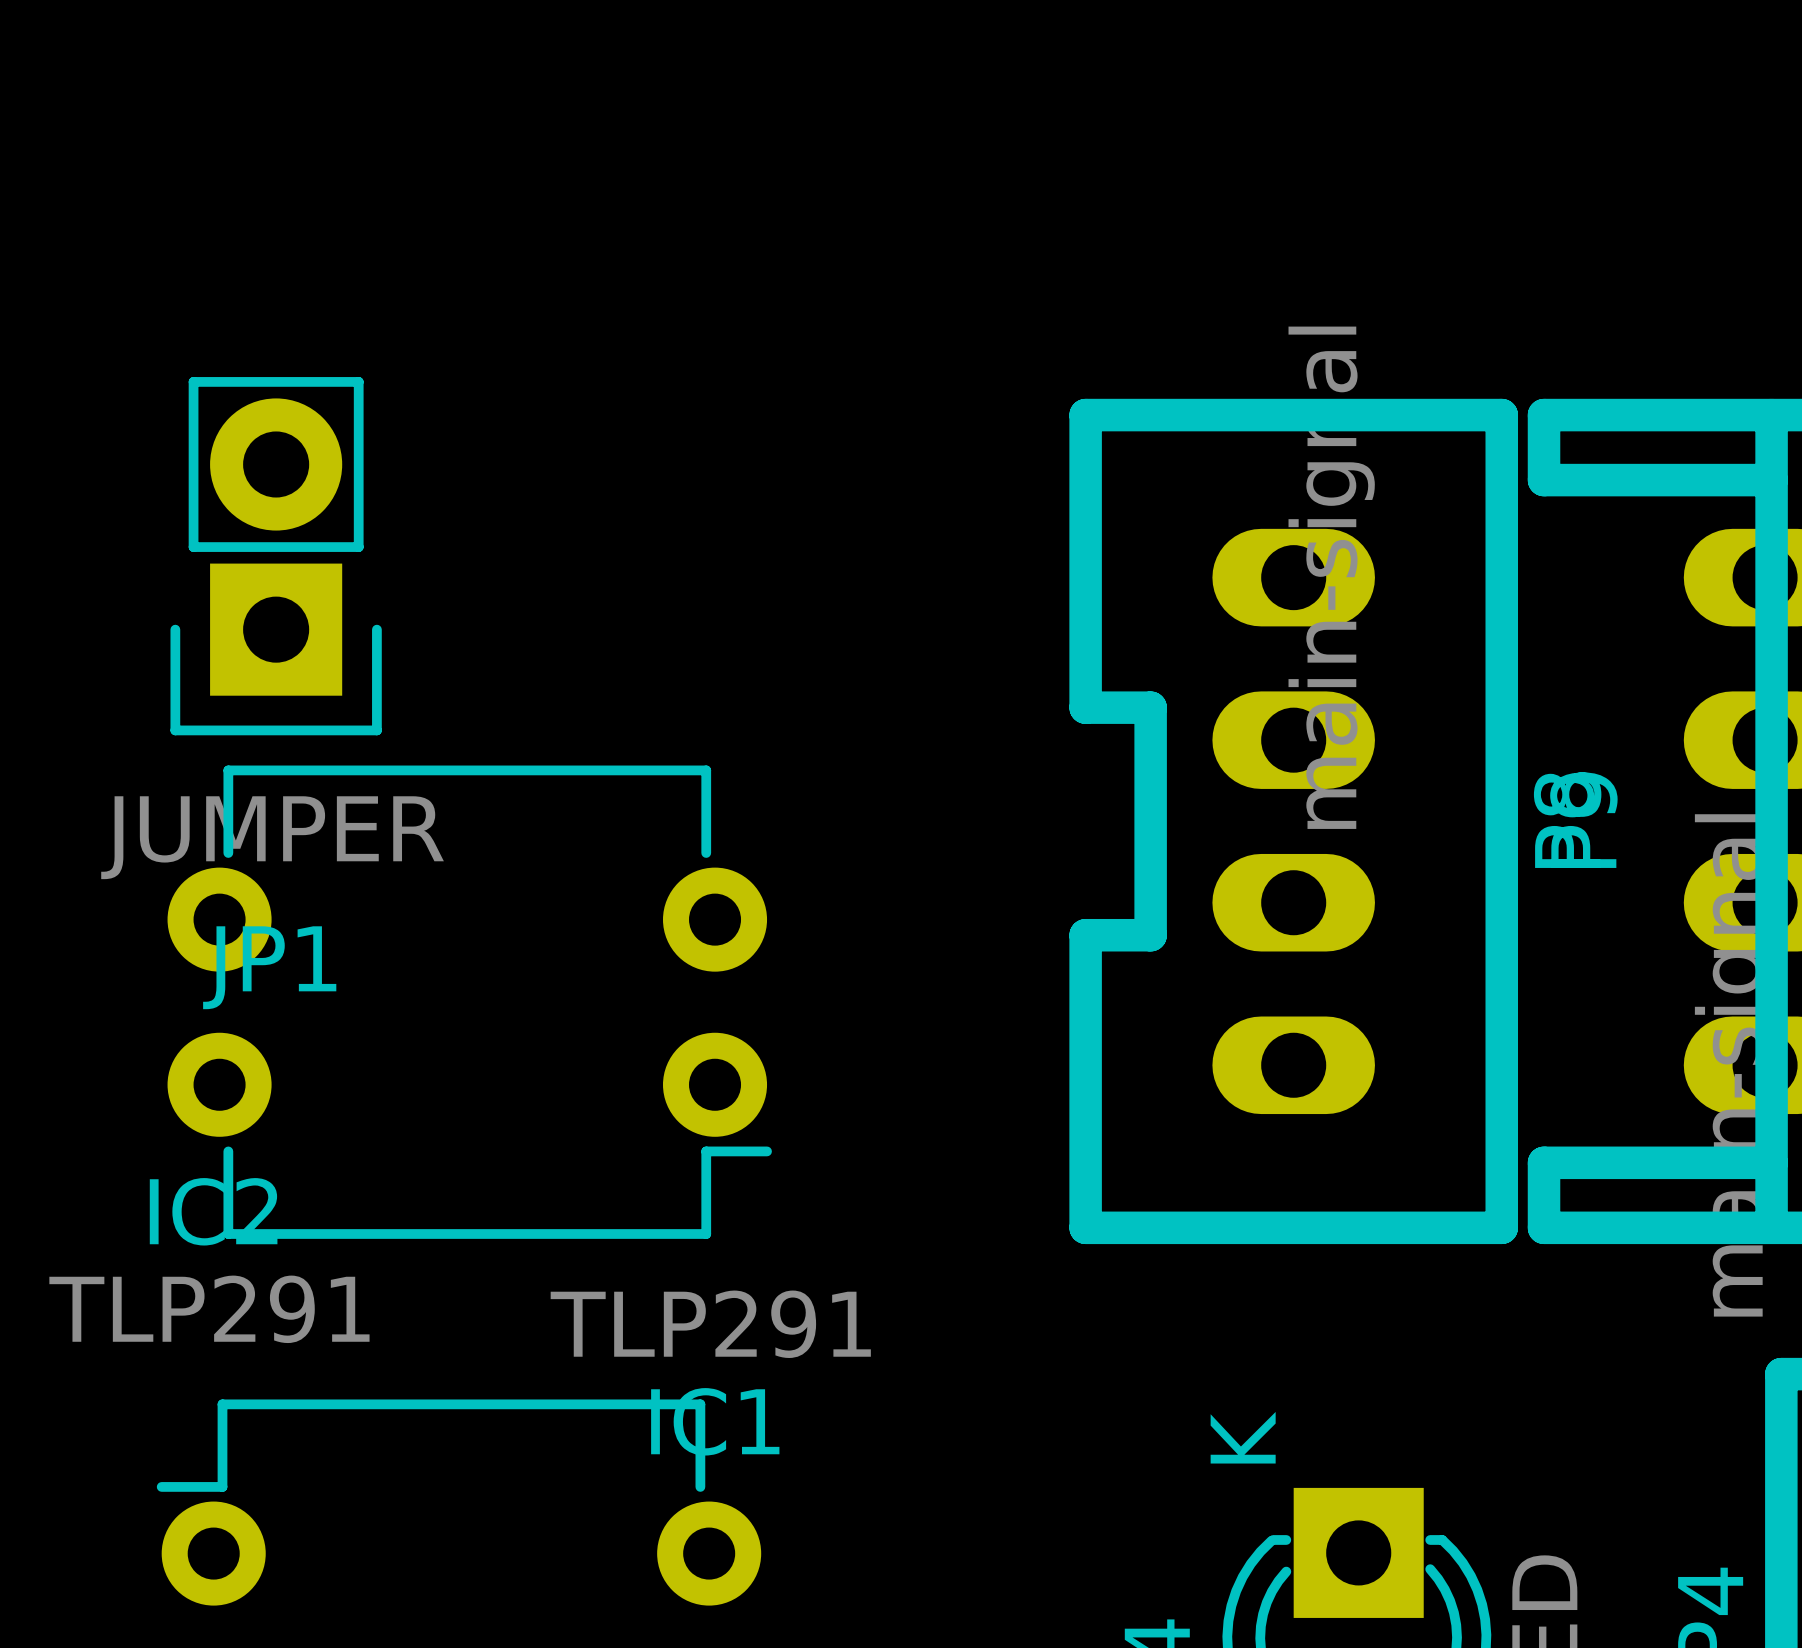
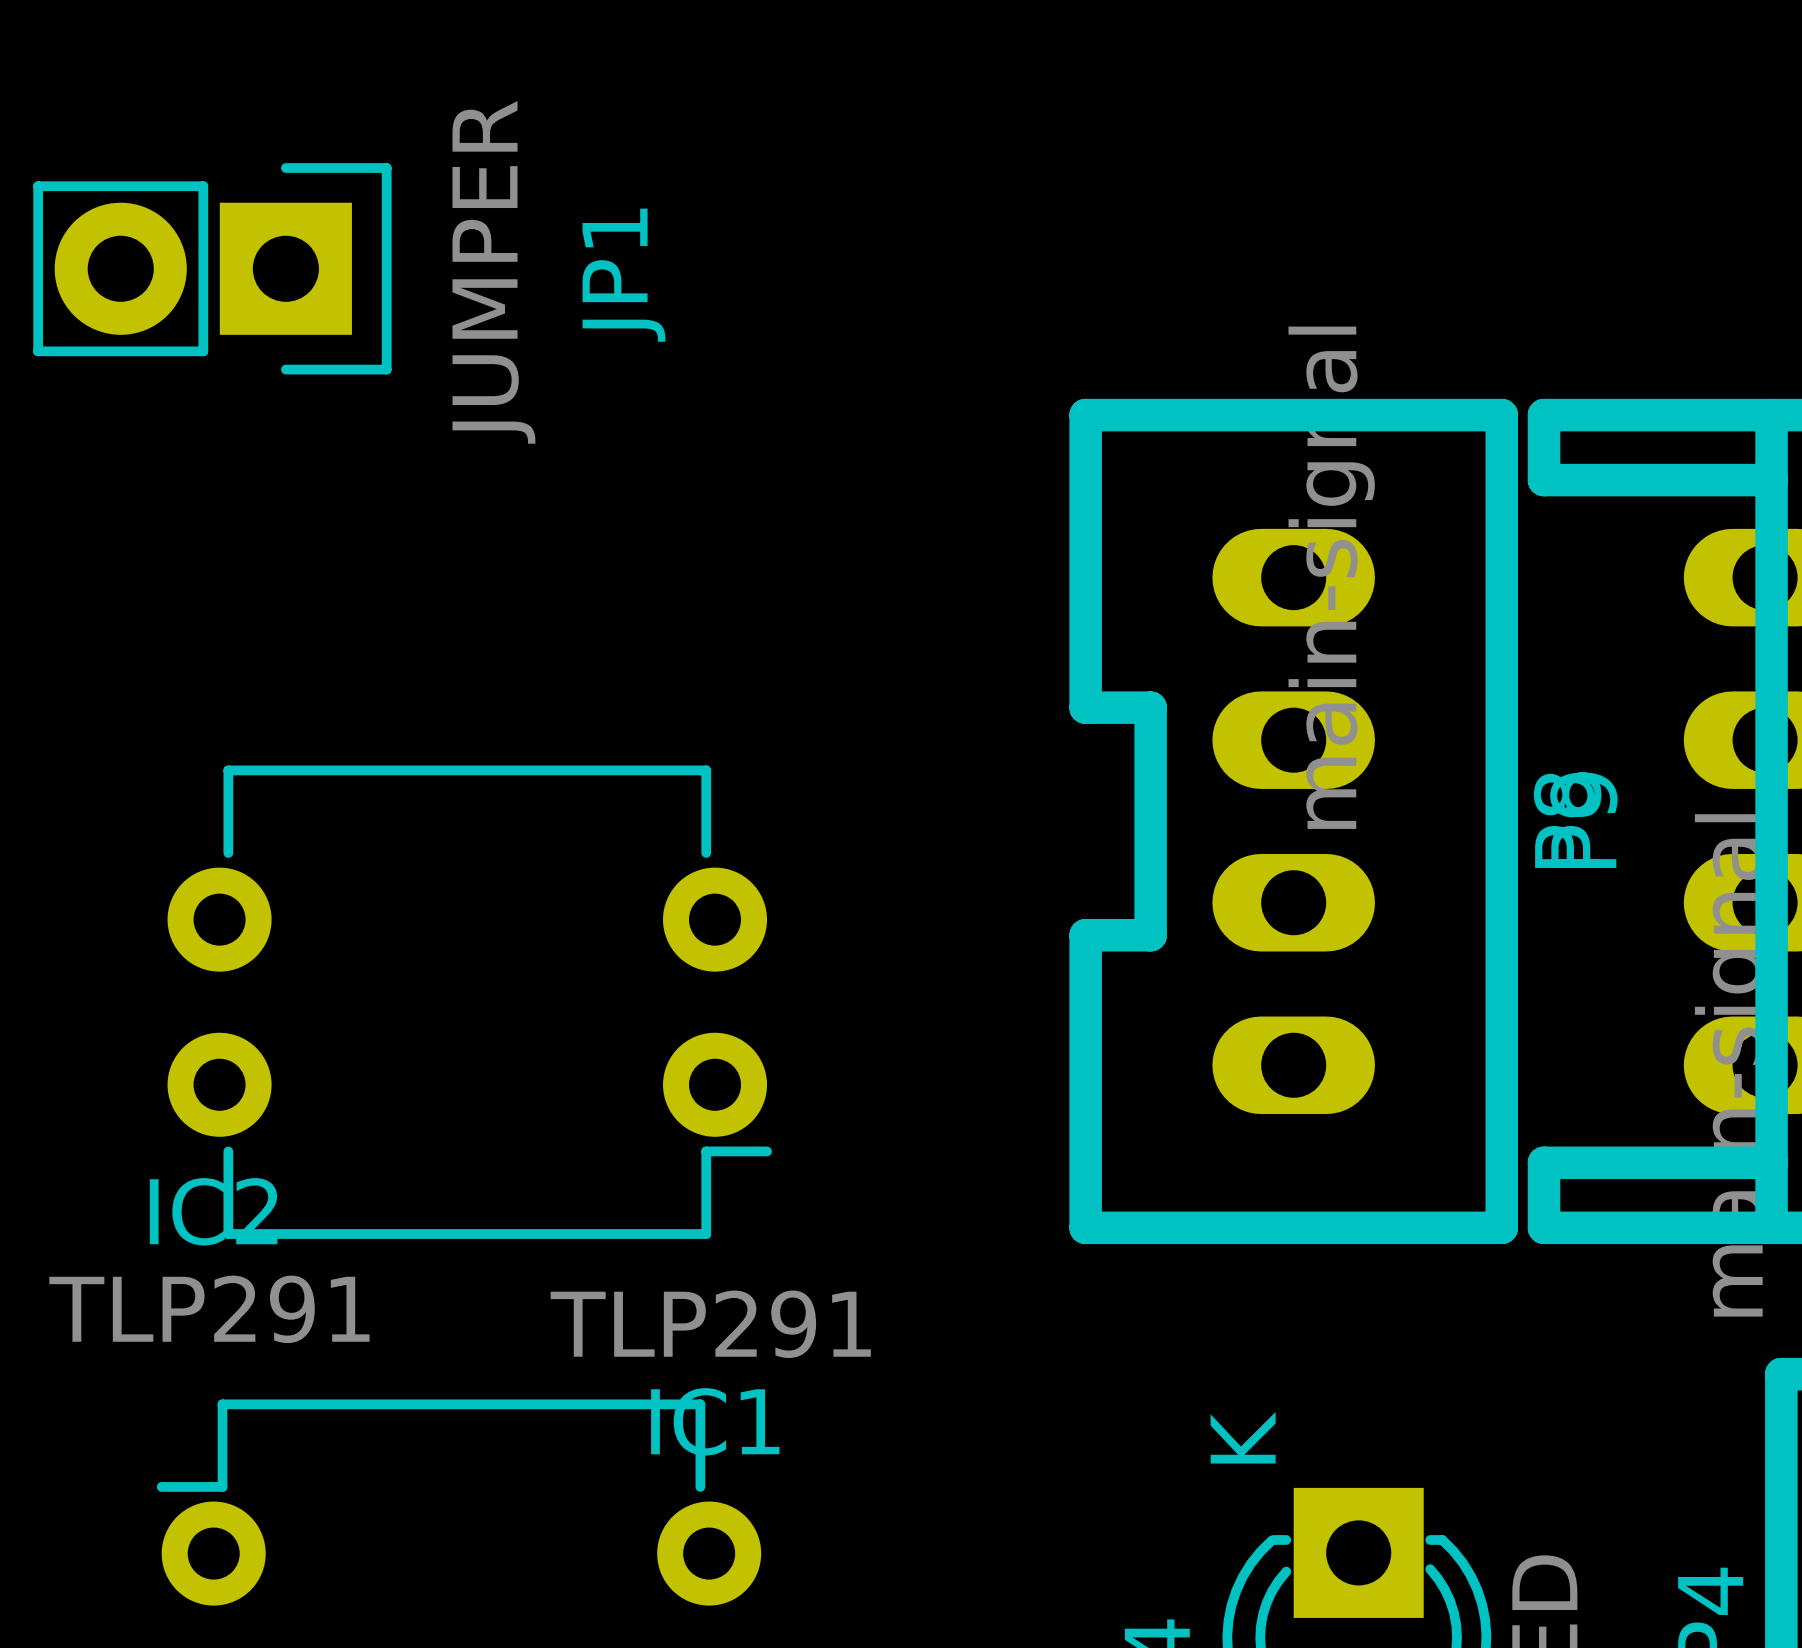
JP1 rotation: 0° (276, 556) -> 90° counterclockwise (212, 268)
JP1 position: (276, 556) -> (212, 268)

